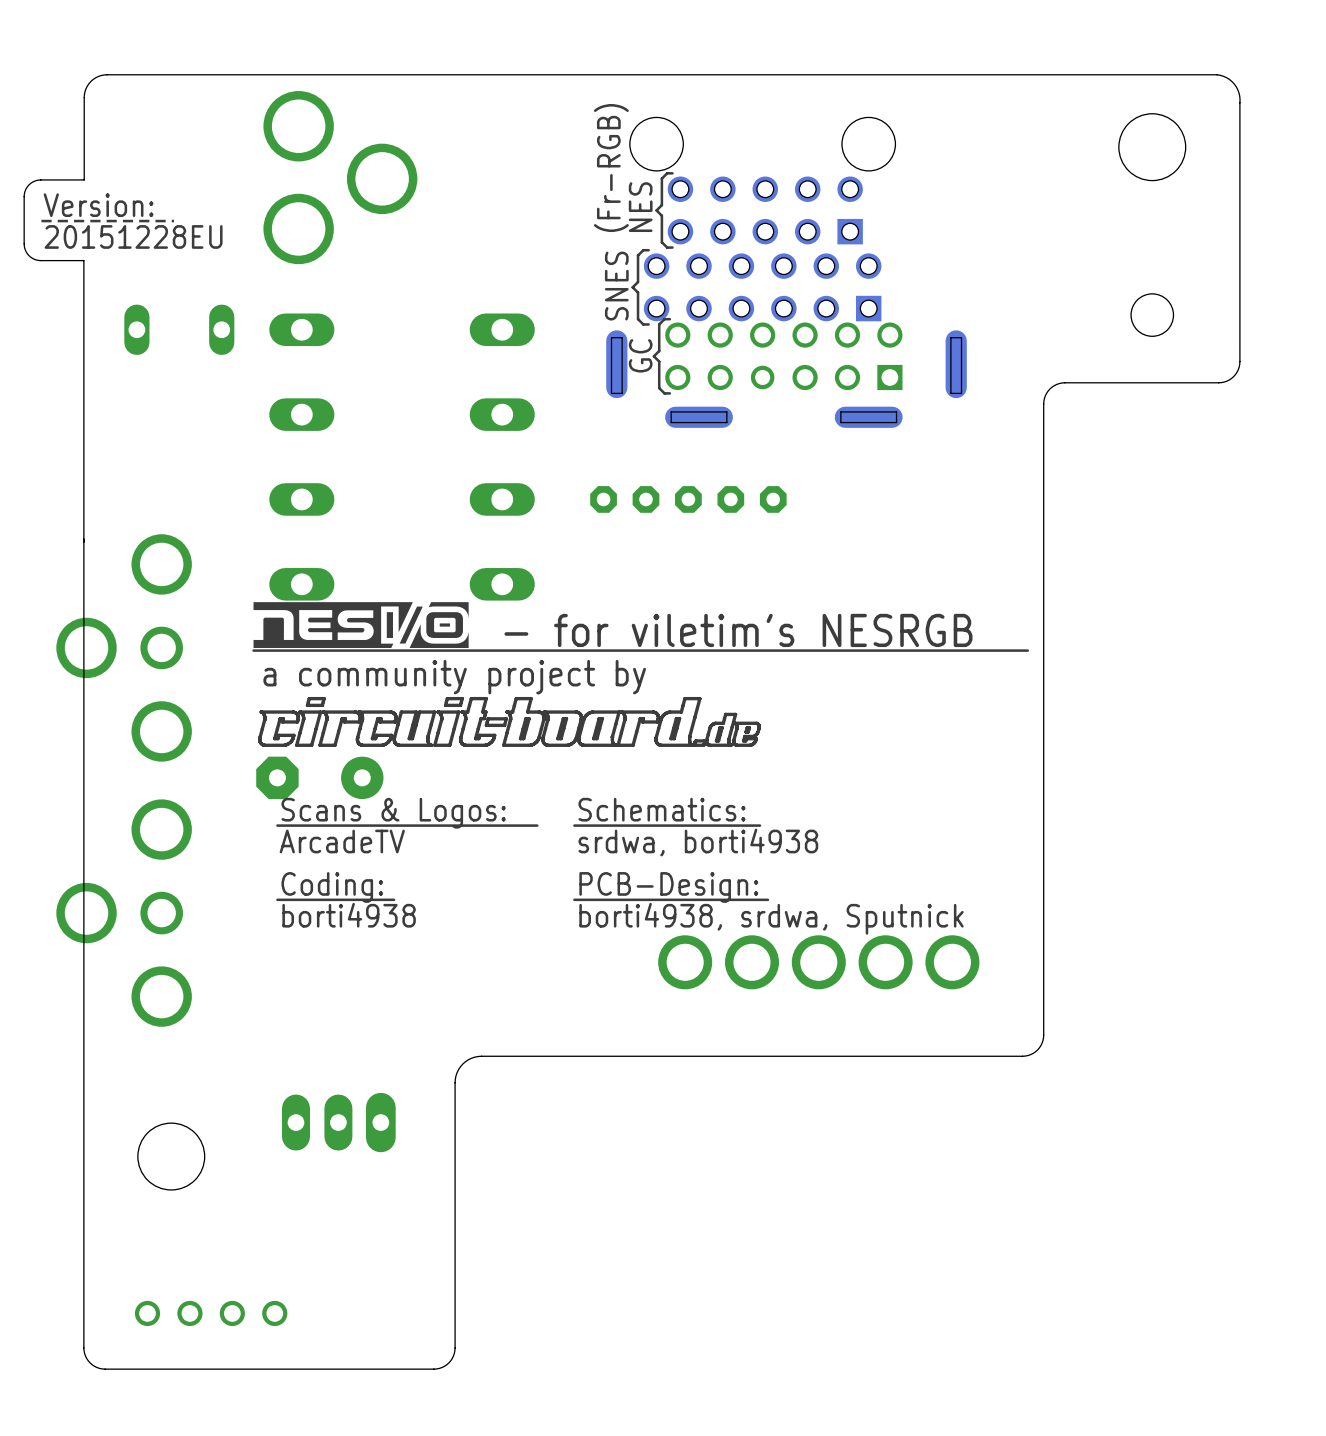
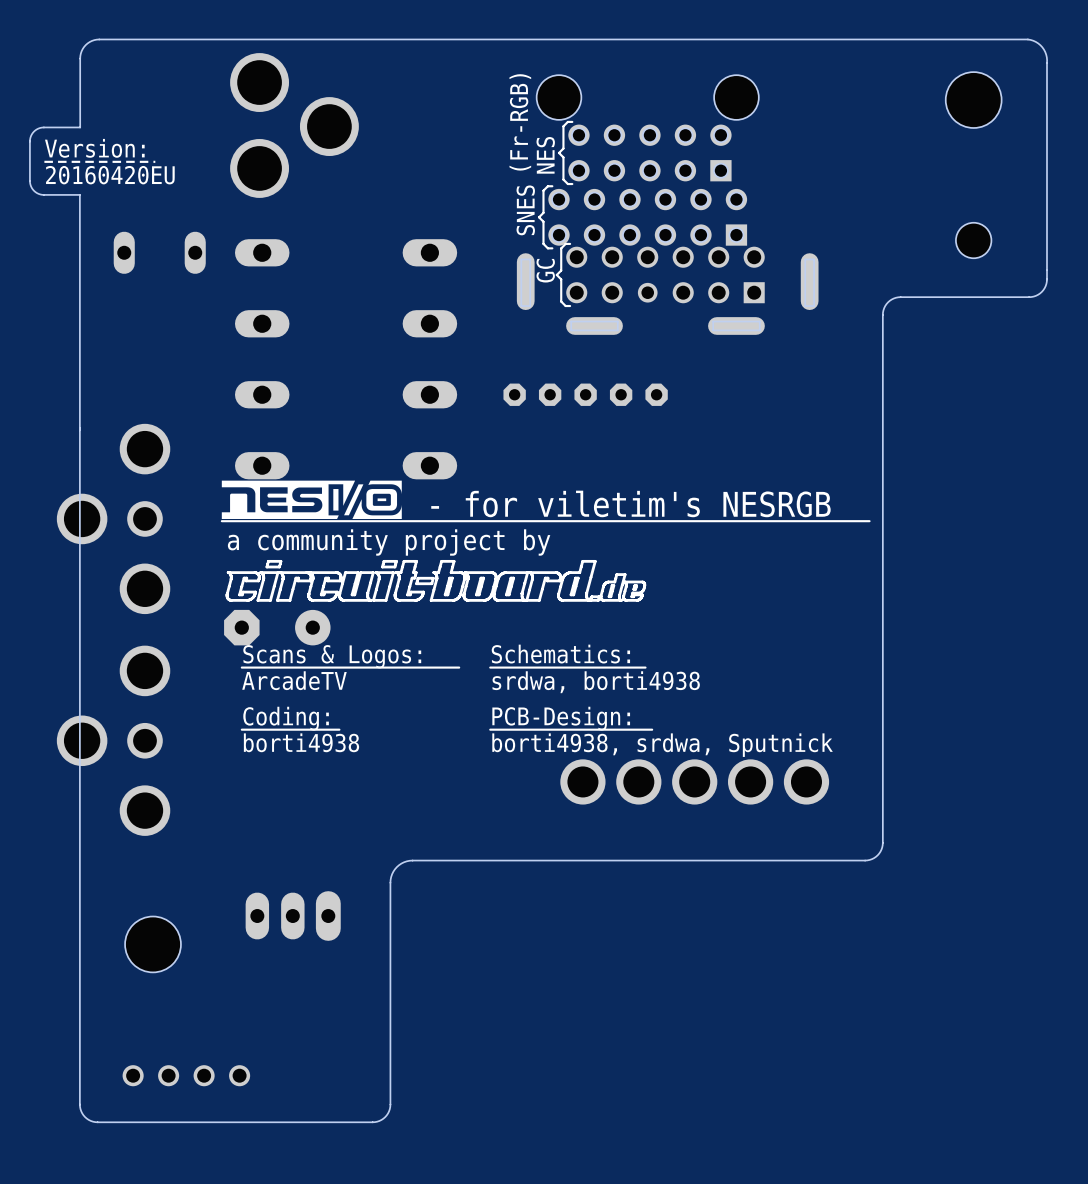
text: 20151228EU (133, 236) -> 20160420EU (110, 175)

